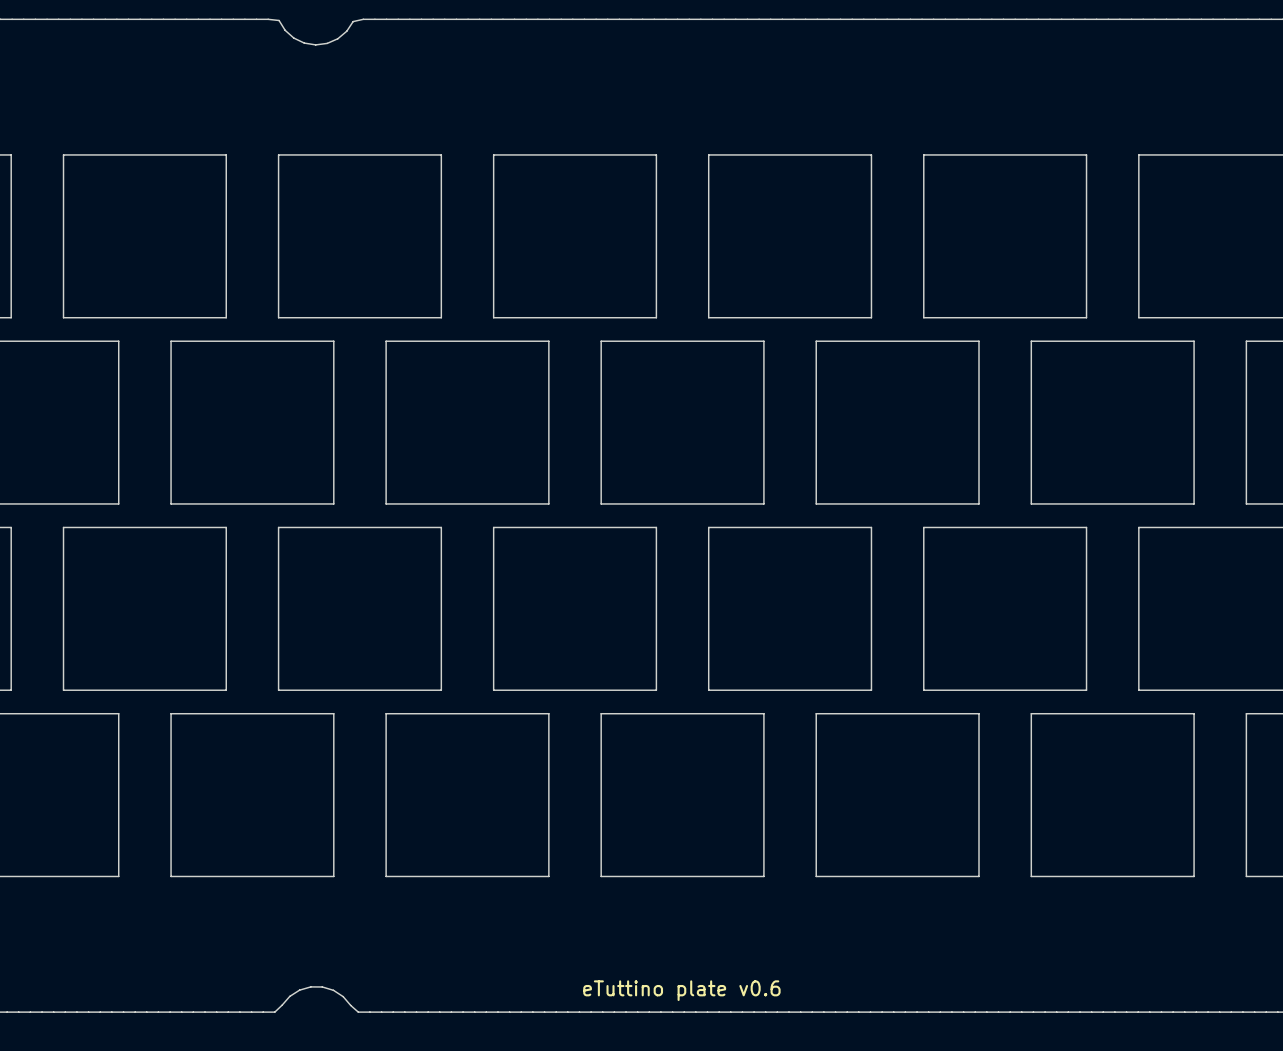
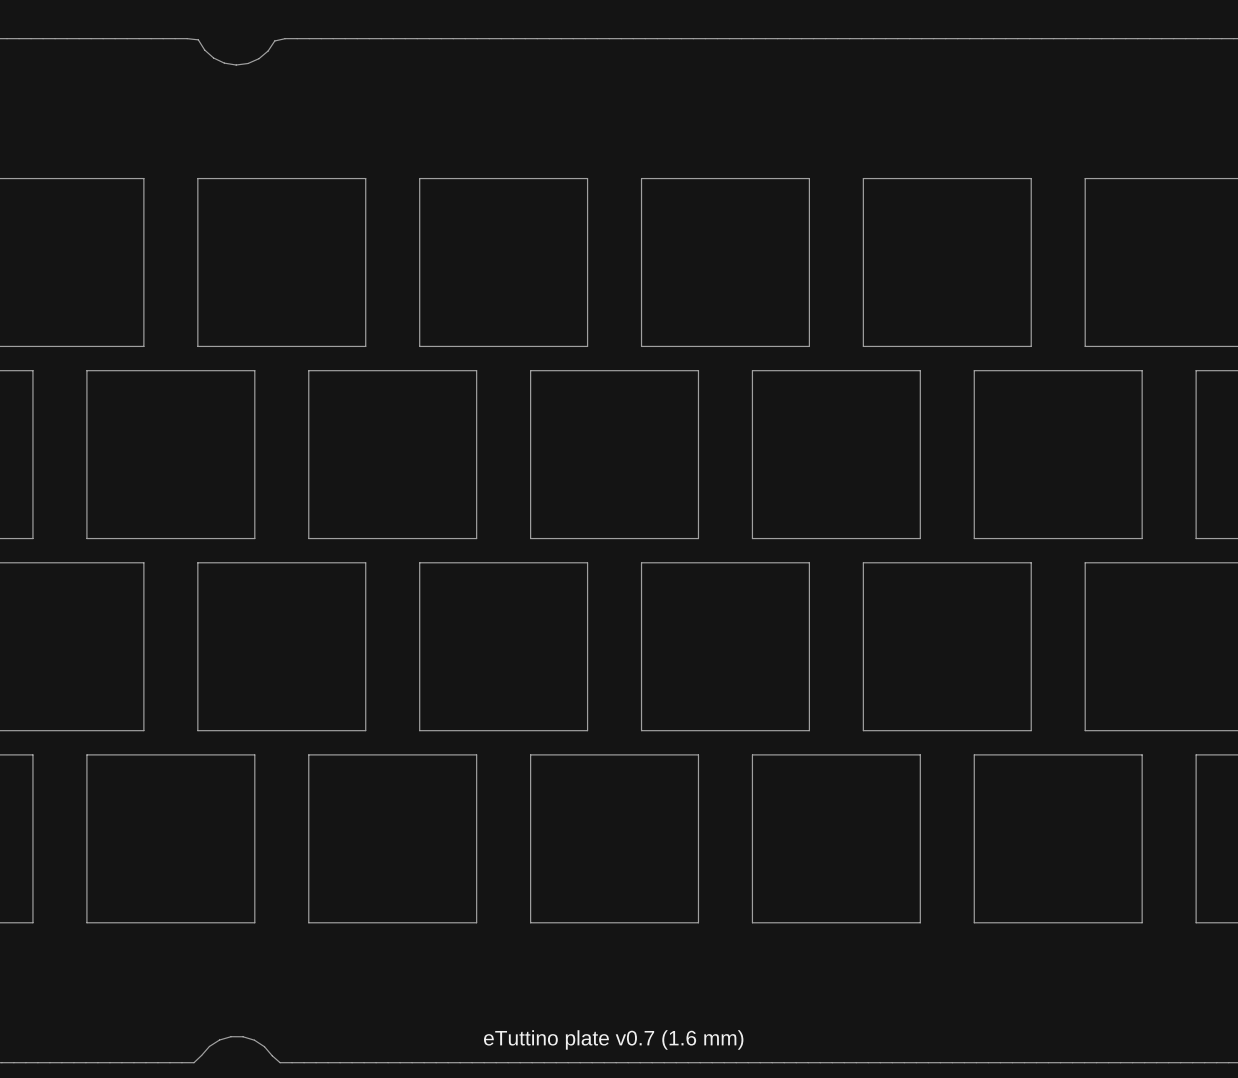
text: eTuttino plate v0.6 (681, 990) -> eTuttino plate v0.7 (1.6 mm) (613, 1039)

